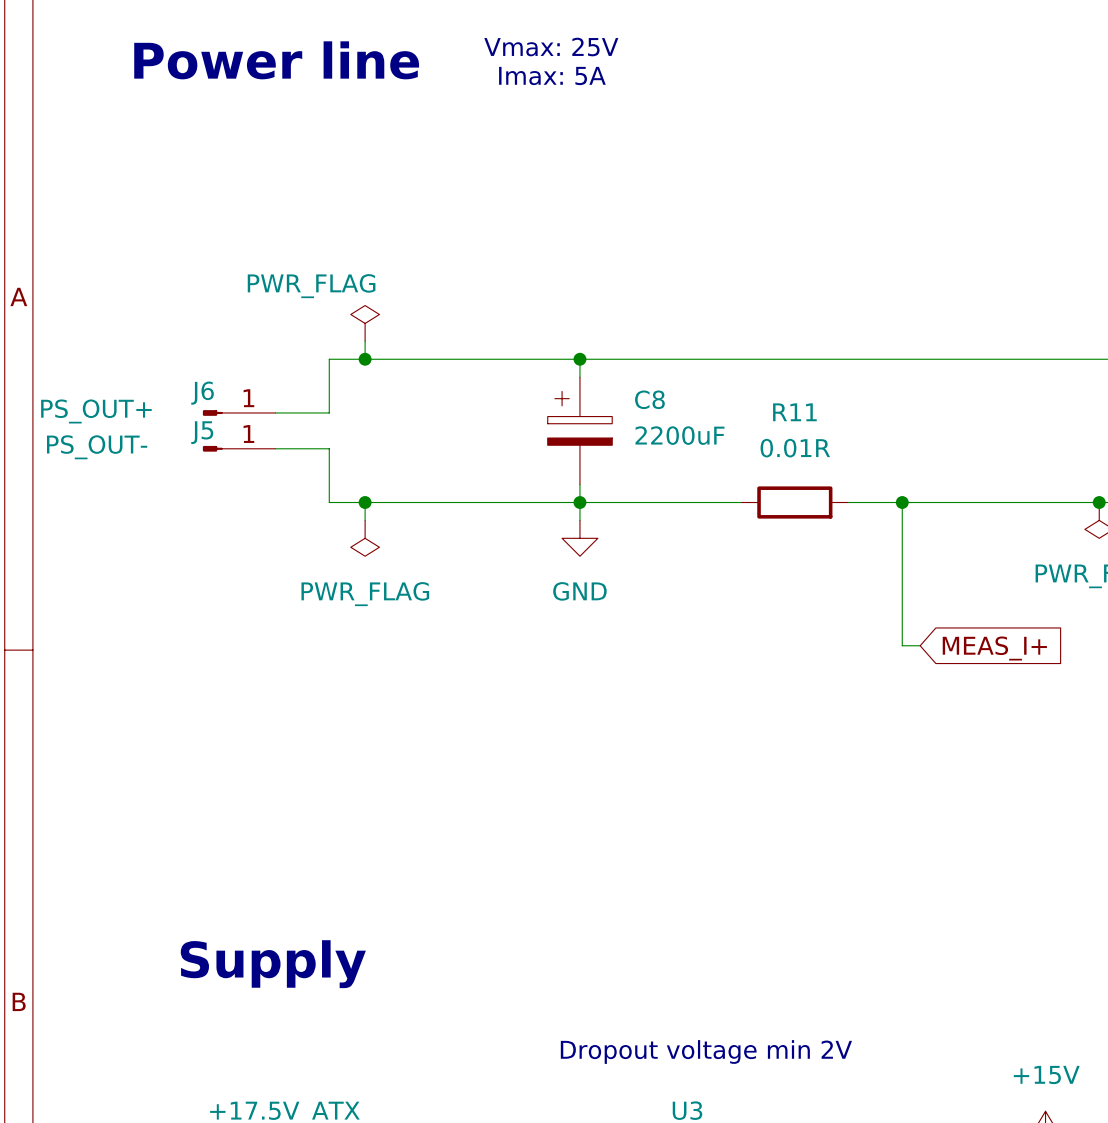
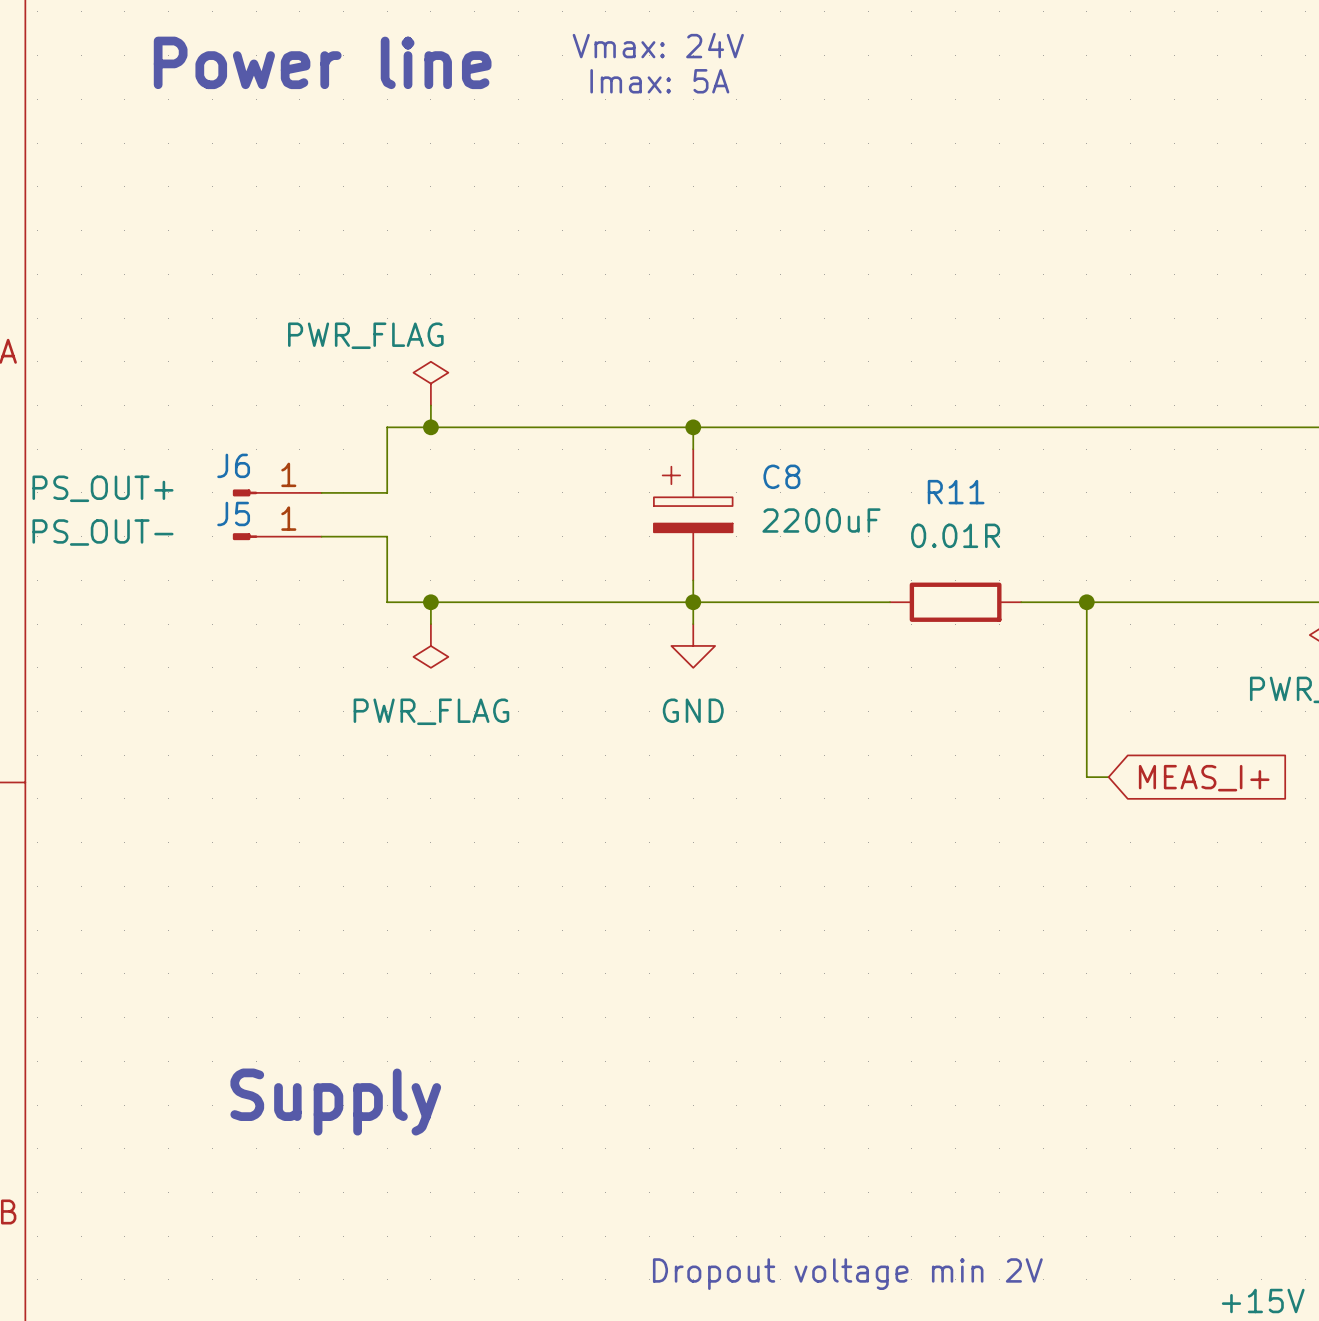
text: Vmax: 25V (551, 47) -> Vmax: 24V (658, 45)
text position: Supply (273, 964) -> Supply (335, 1102)

